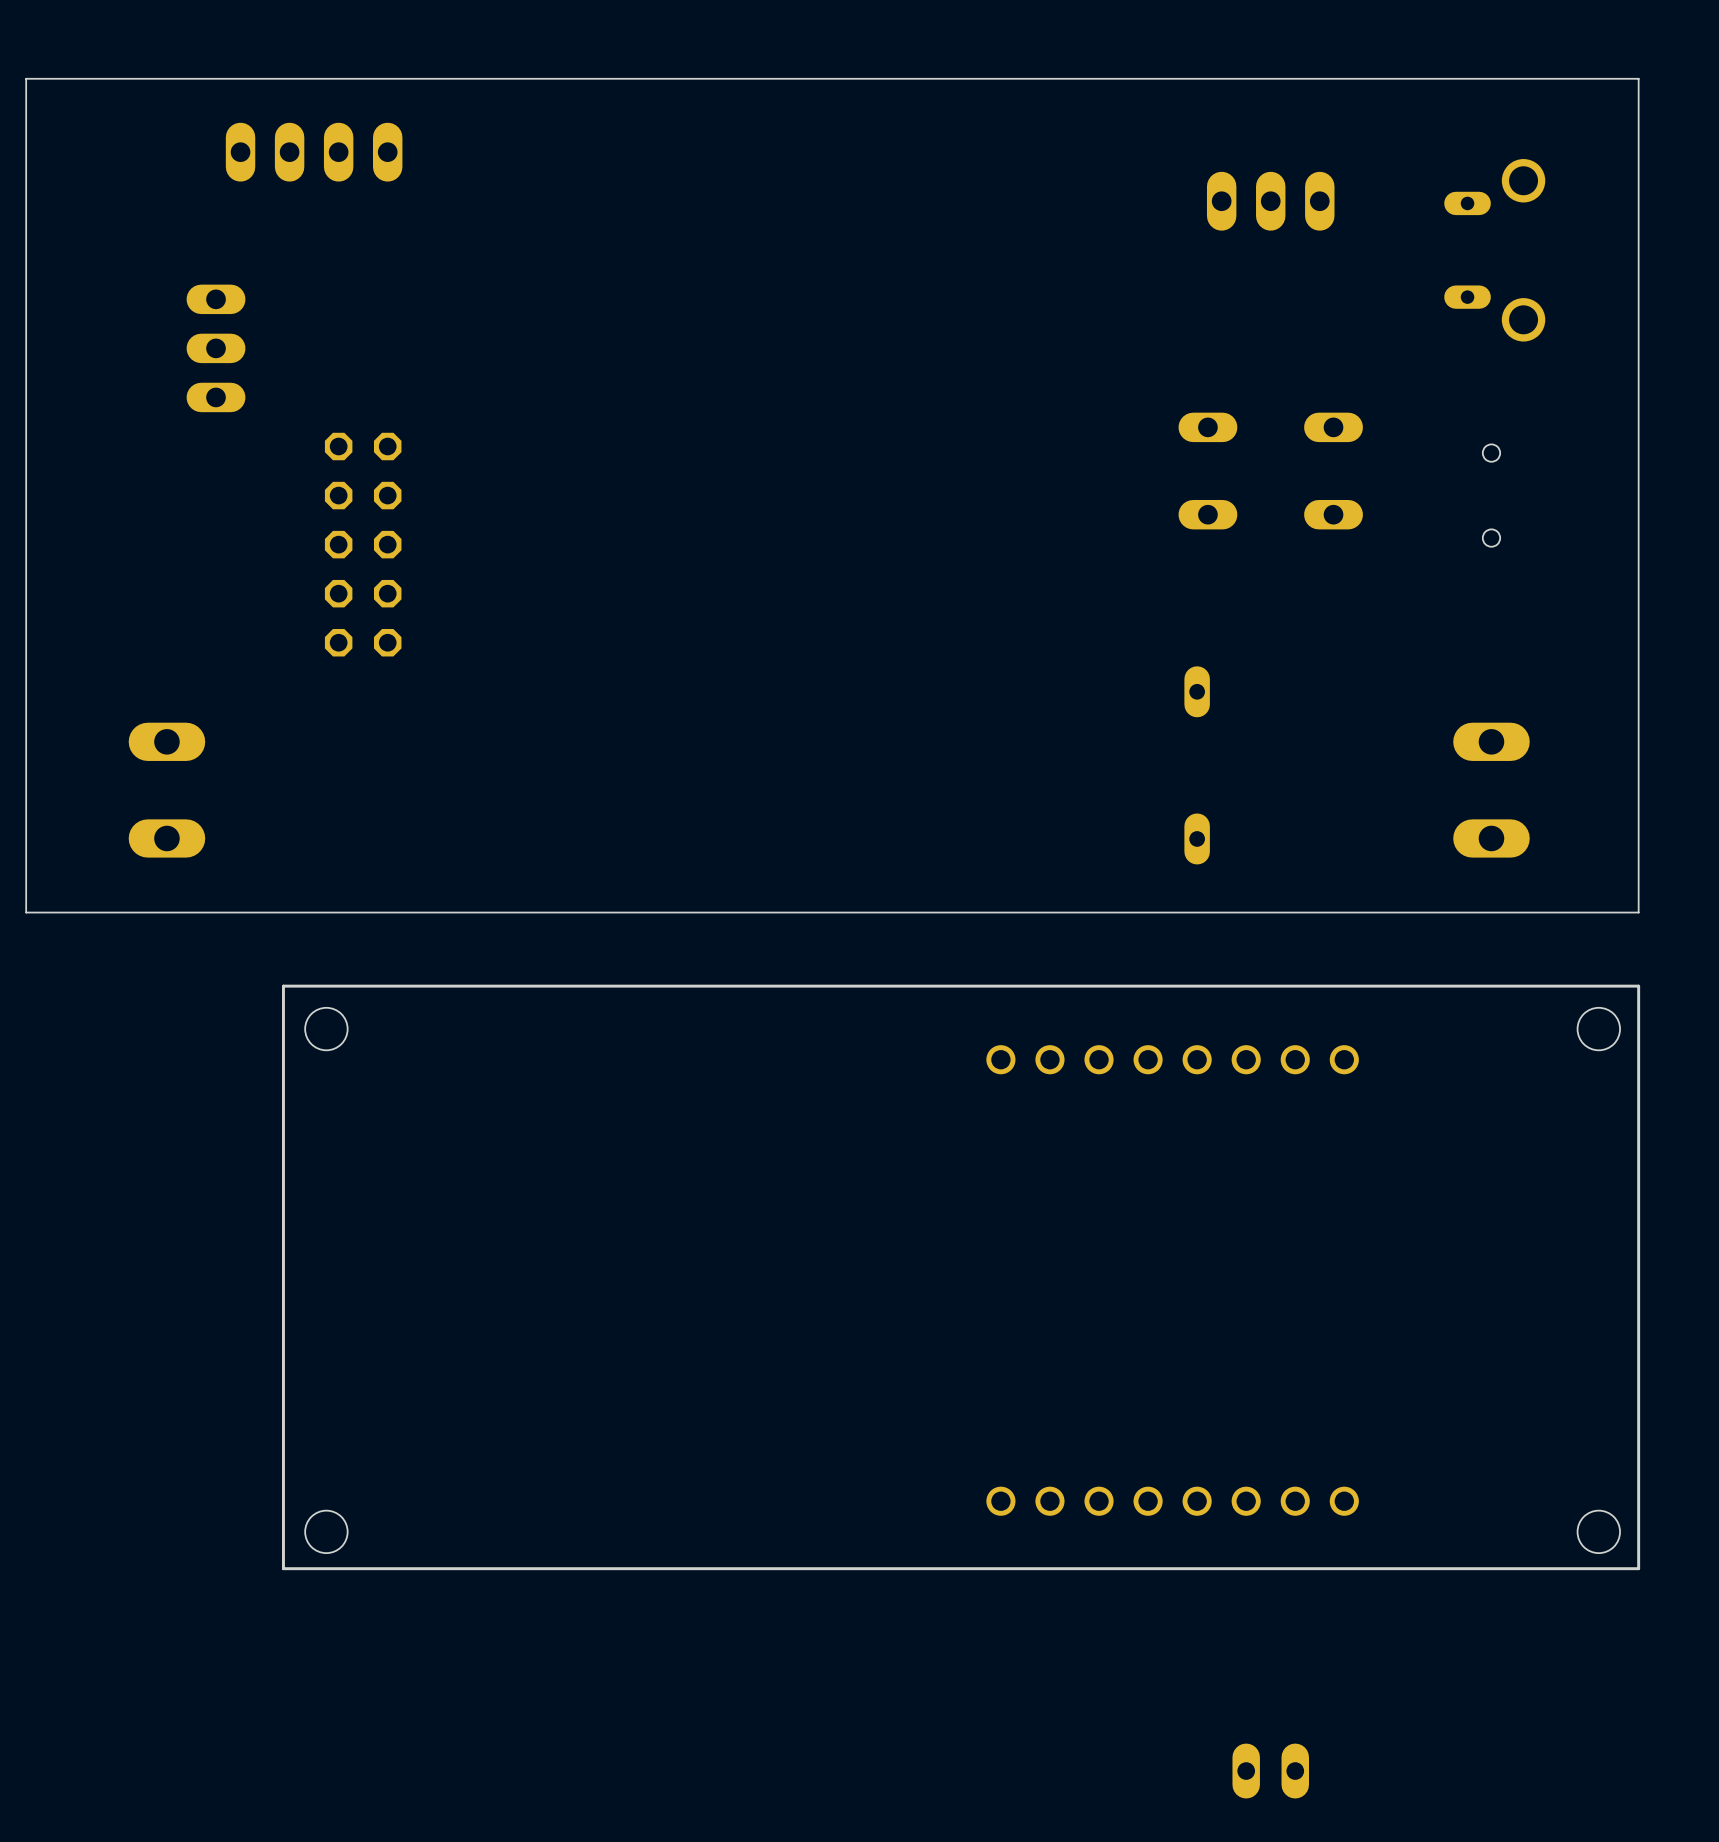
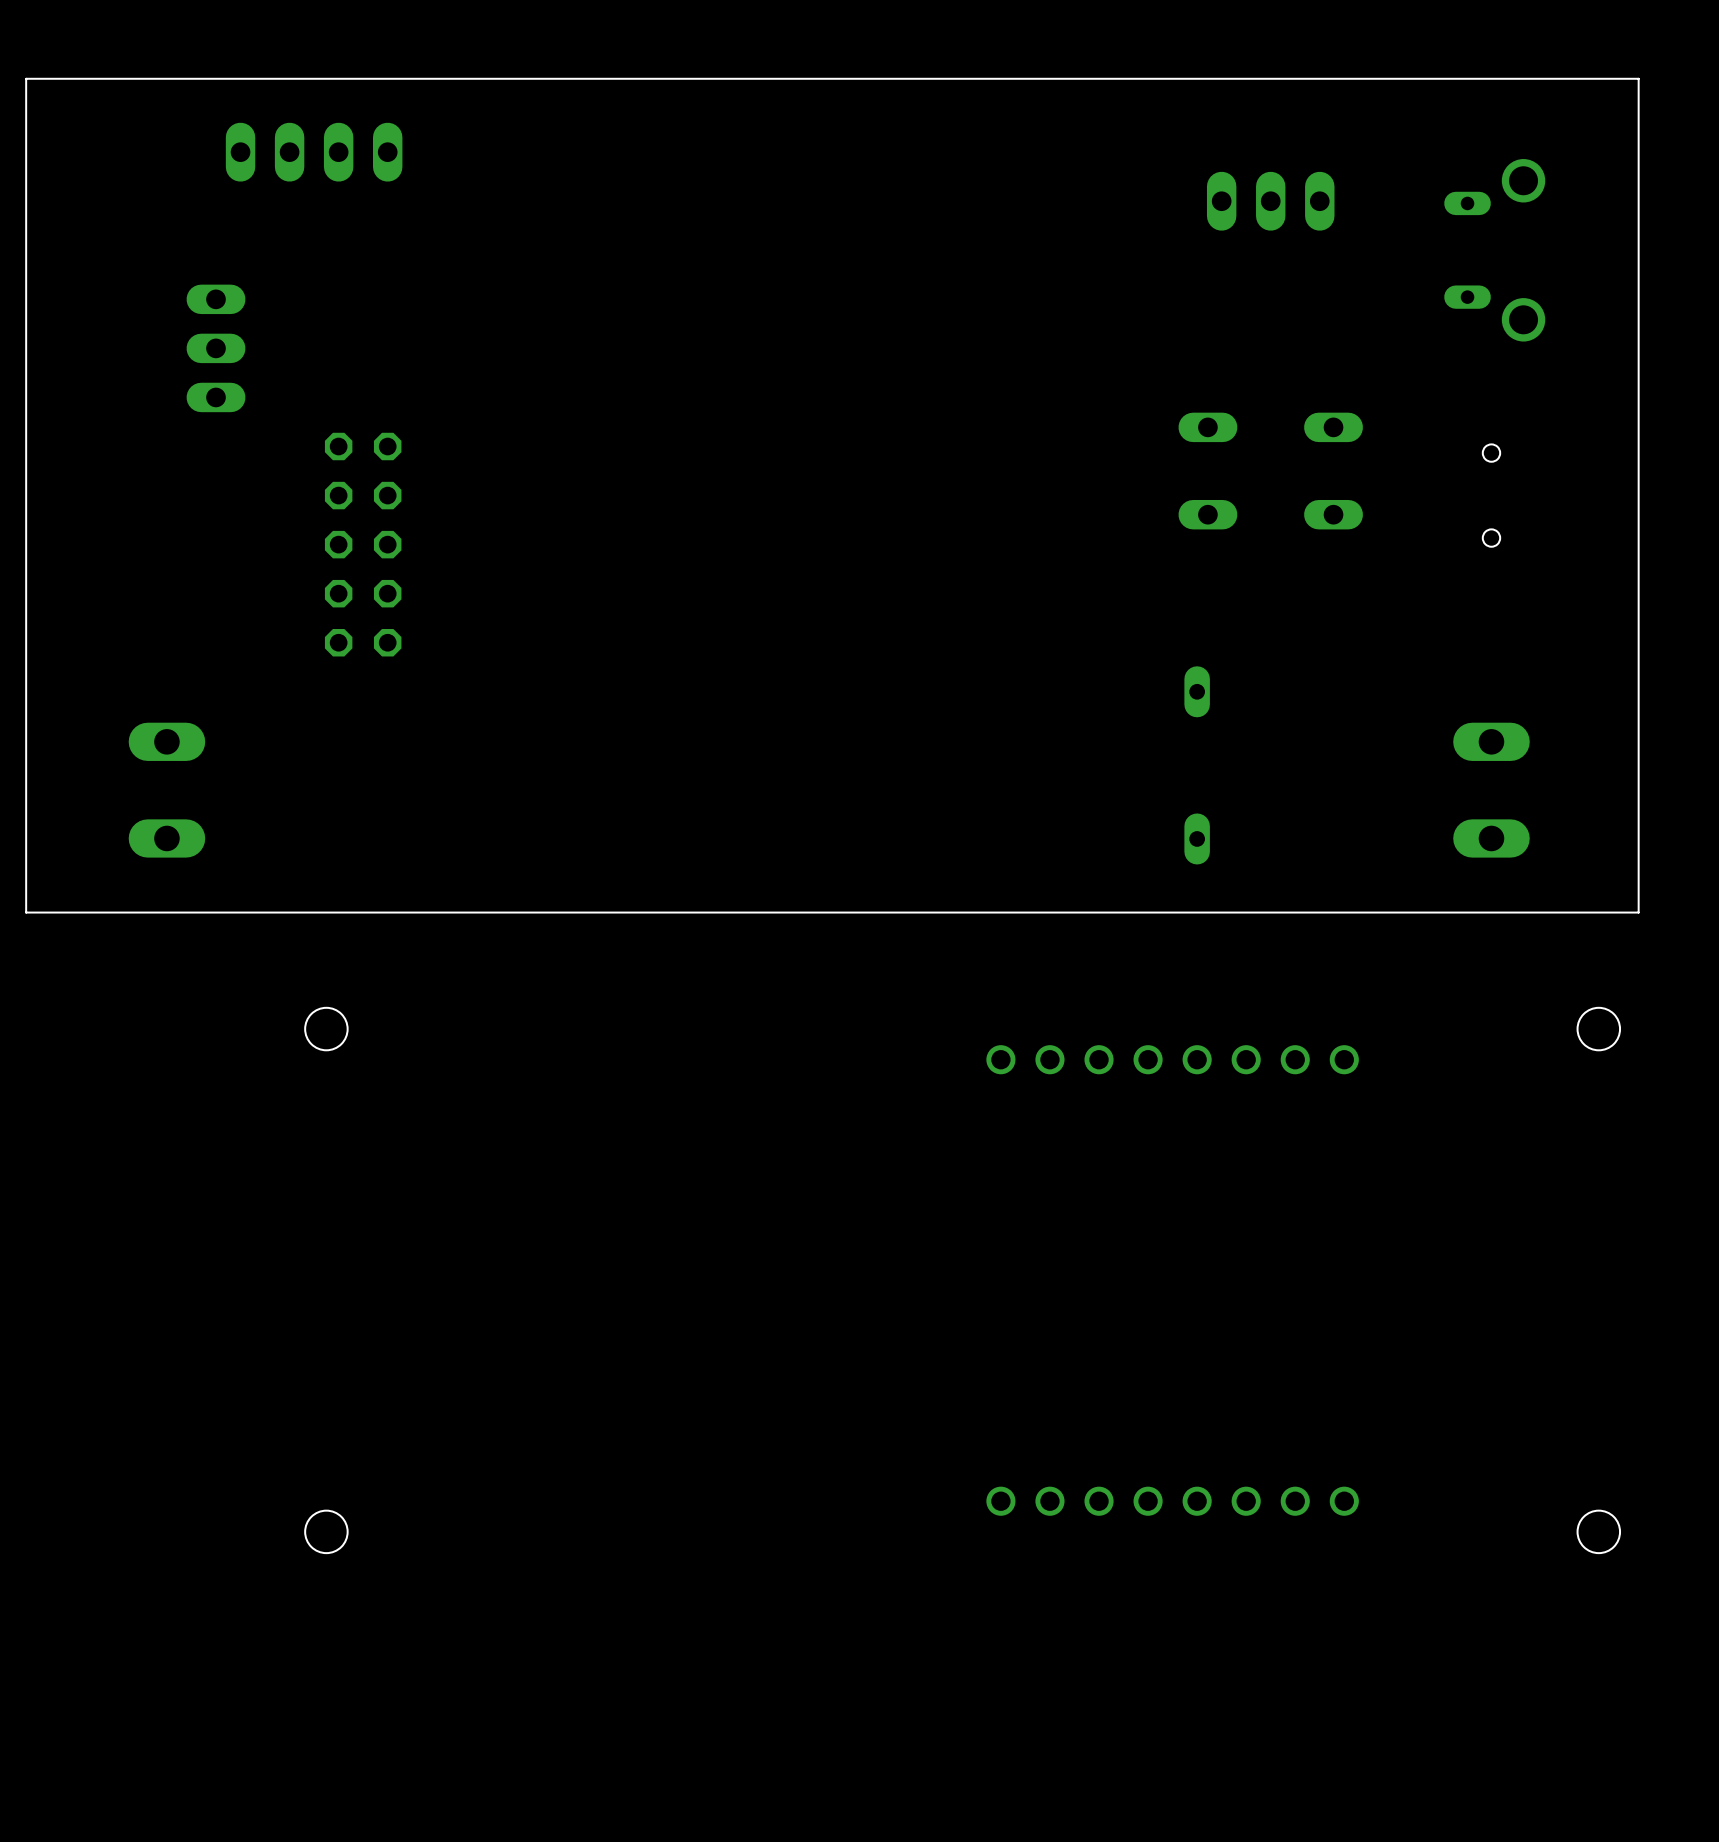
board edge: (1638, 986) (1638, 1568) (283, 1568) (283, 986) (1638, 986) -> none
part: (1270, 1771) -> none

